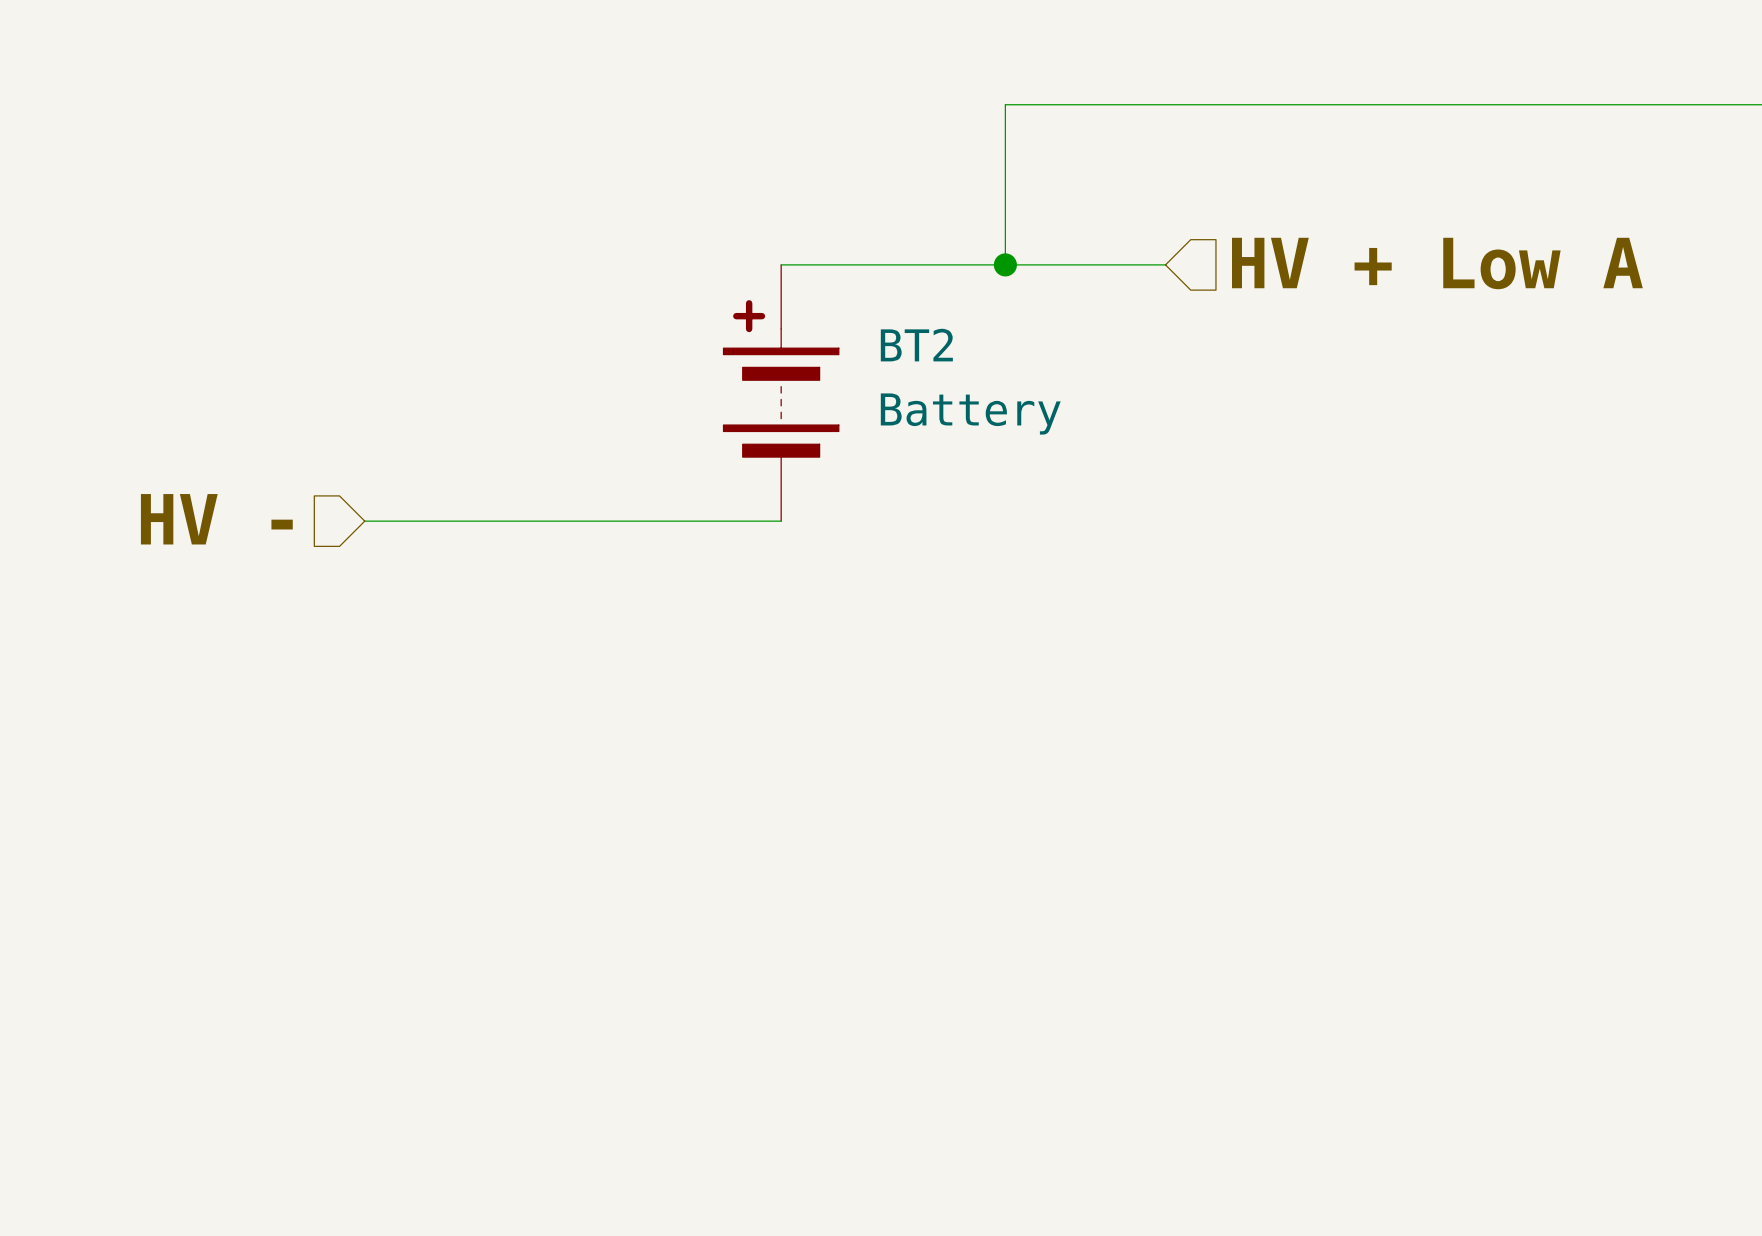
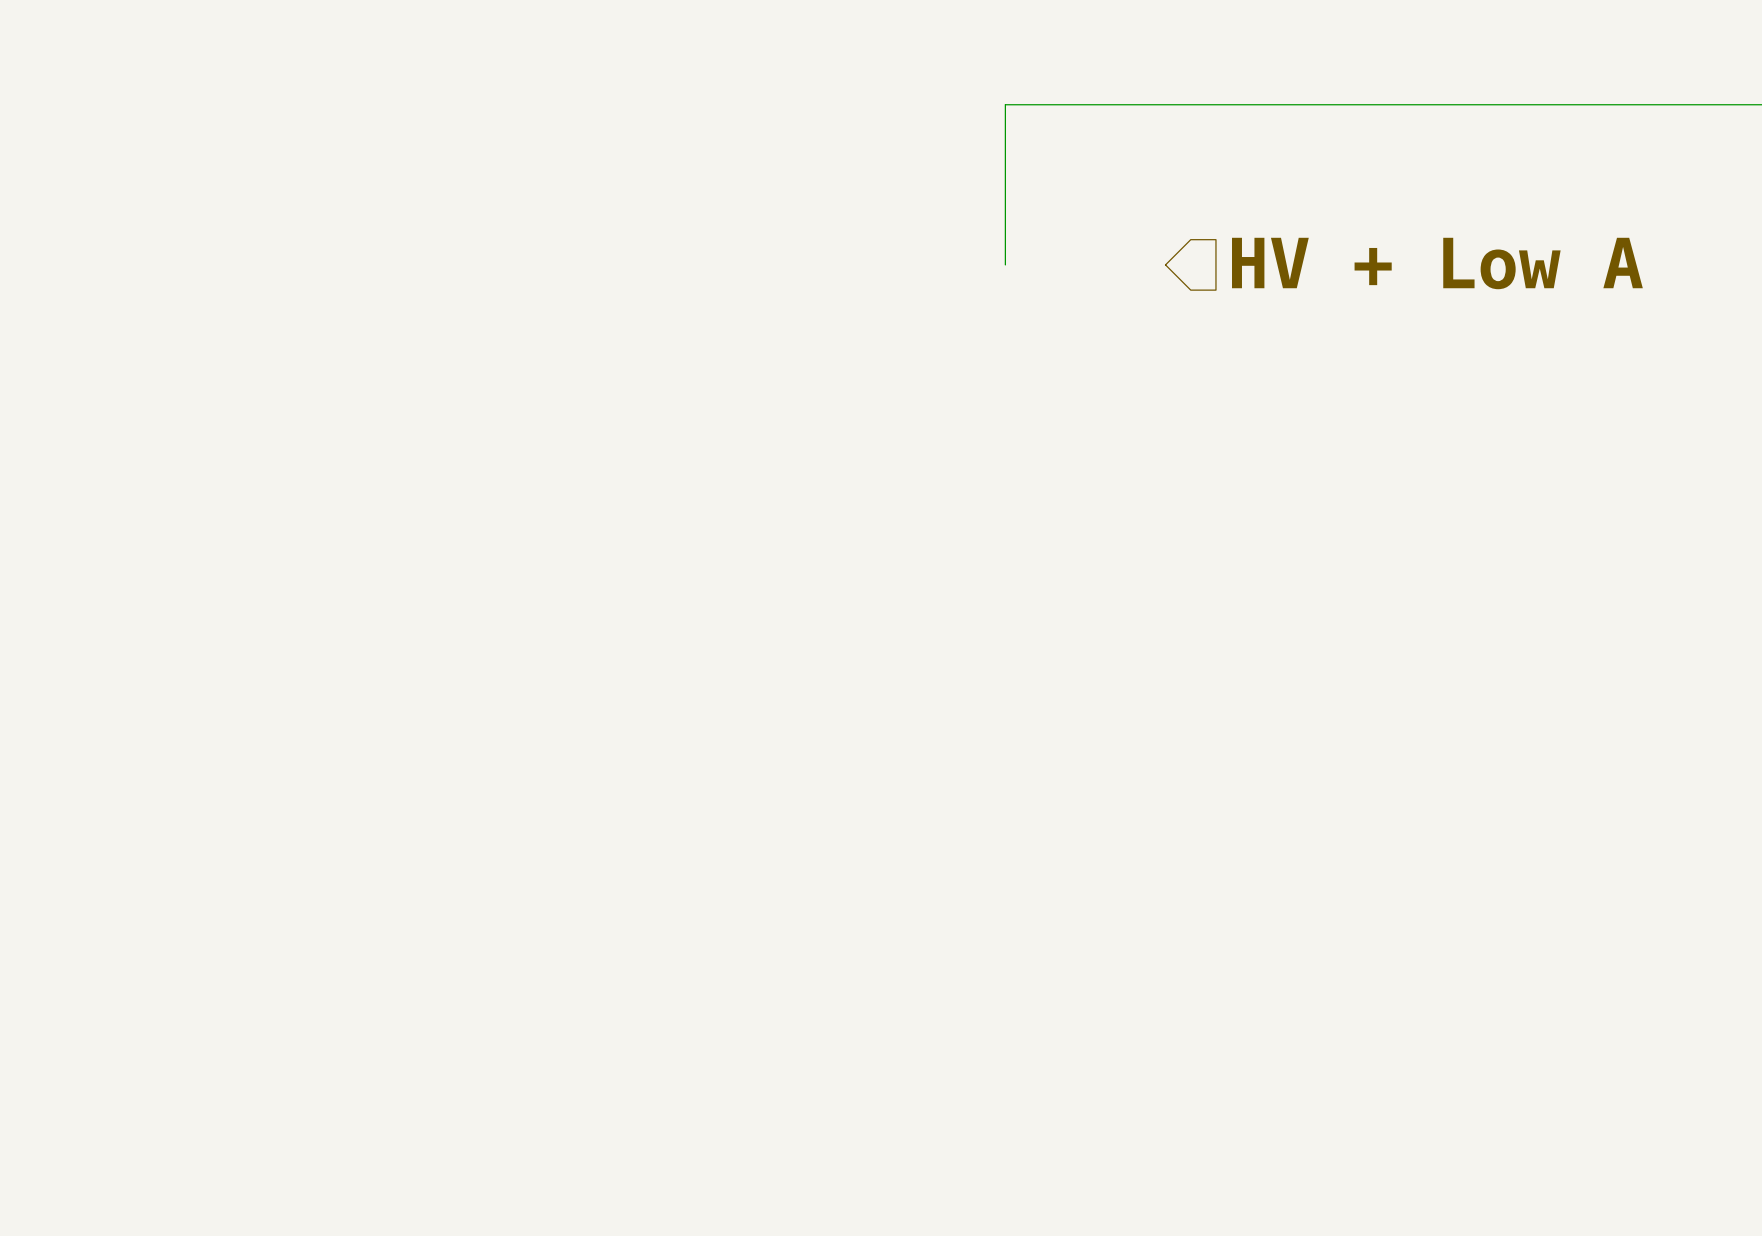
wire: (781, 264) (1165, 264) -> none
junction: (1005, 264) -> none
BT2: Battery (781, 393) -> none
hierarchical label: HV - (216, 519) -> none
wire: (364, 521) (781, 521) -> none

